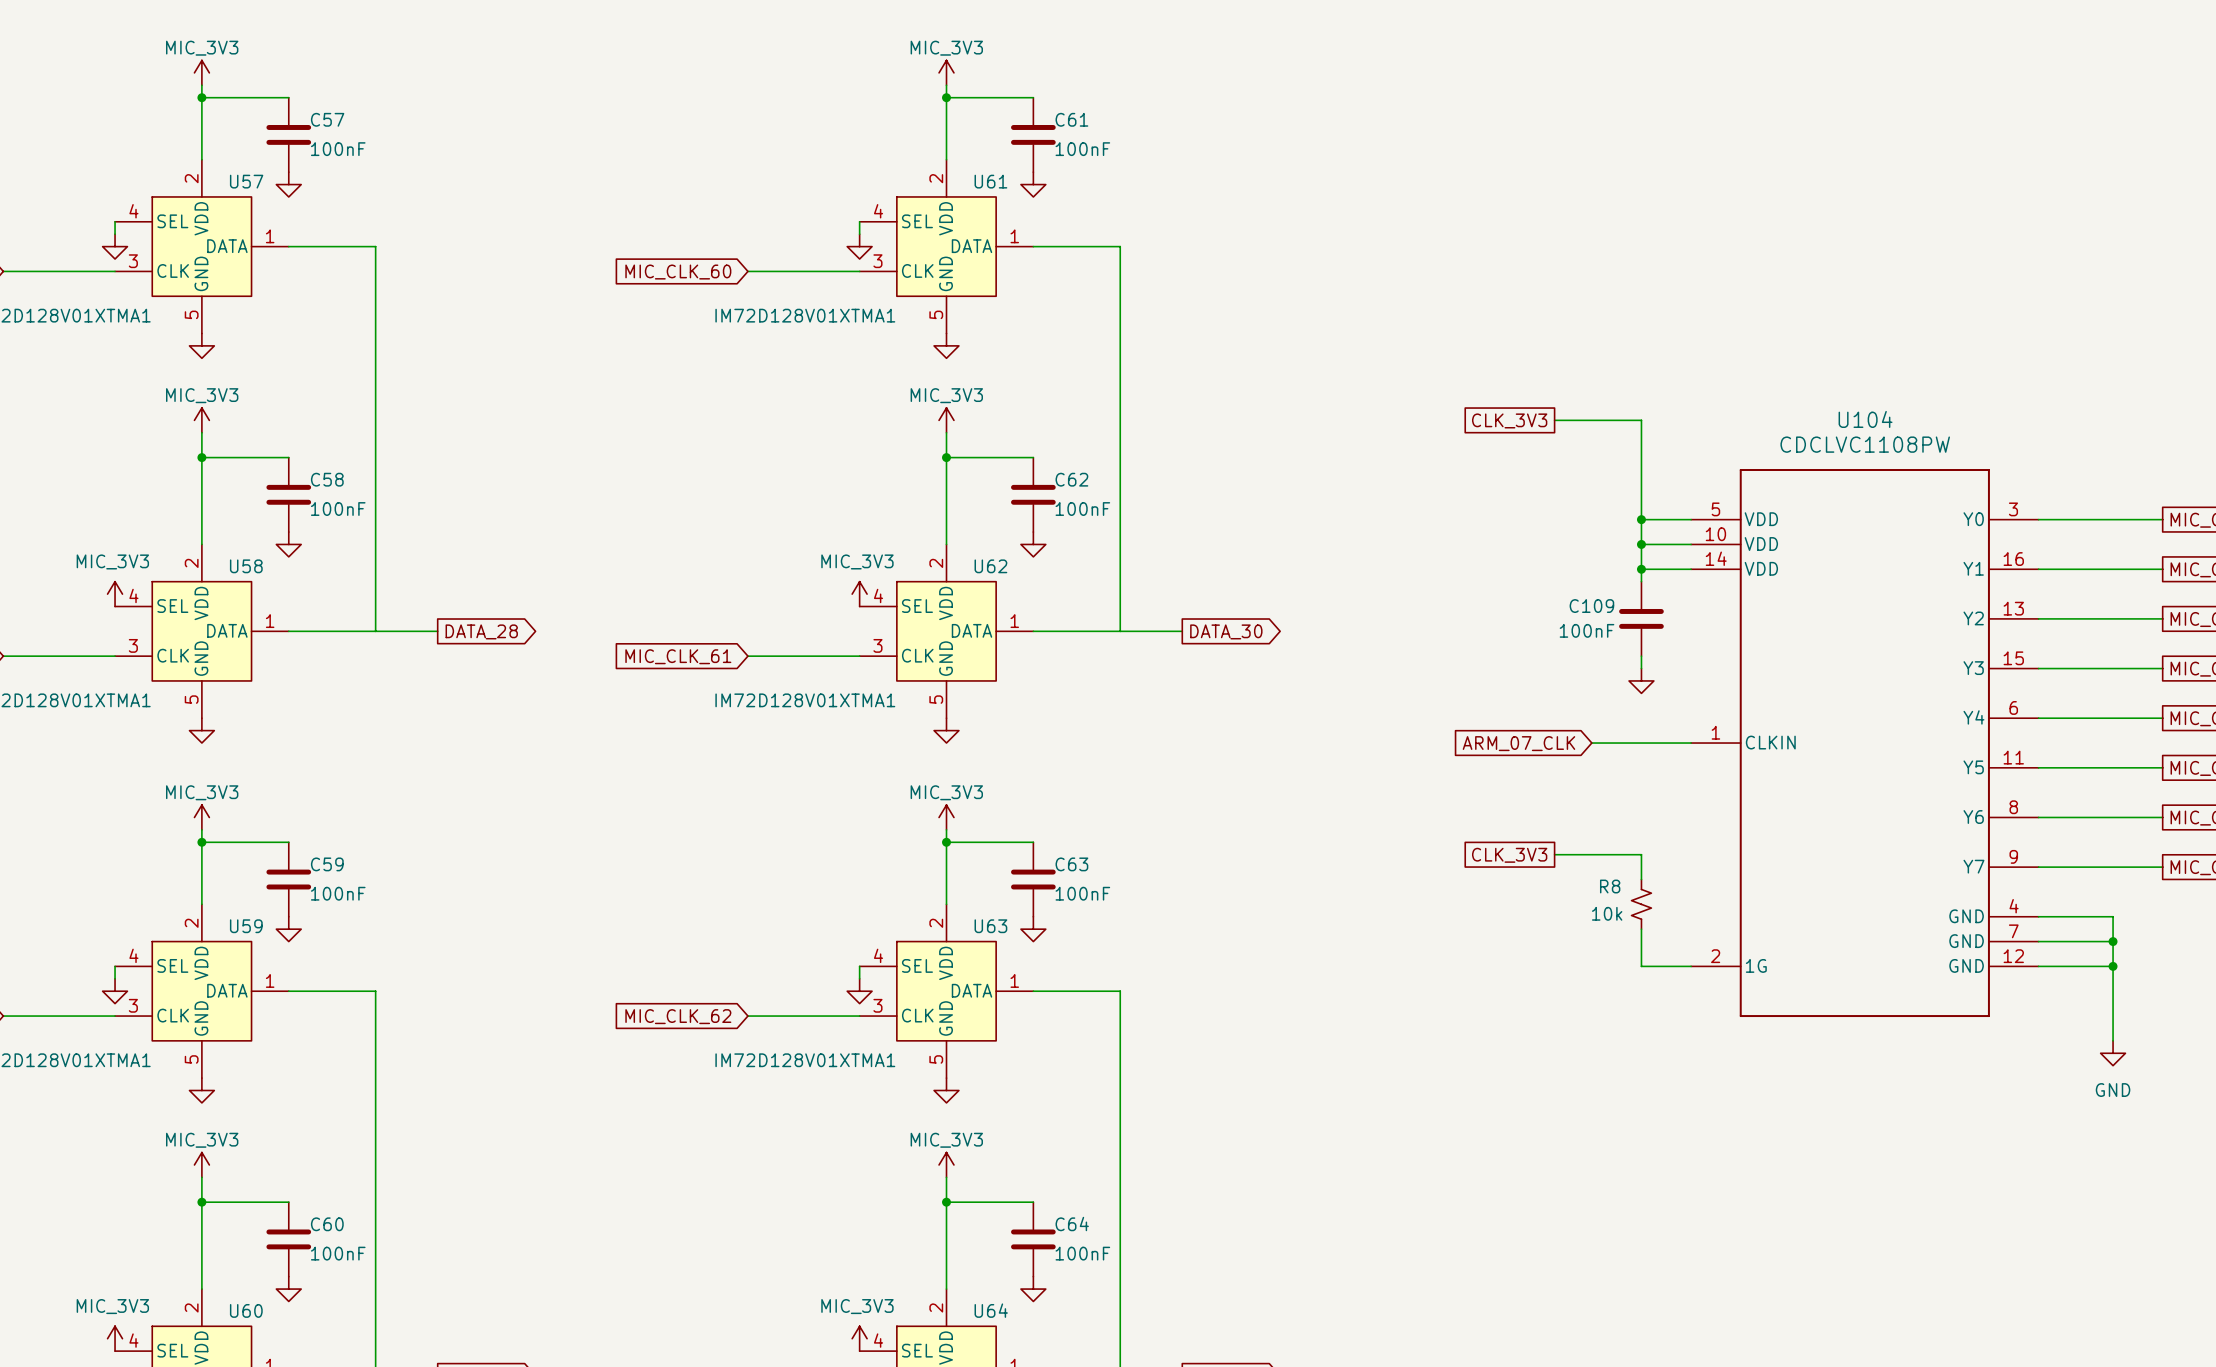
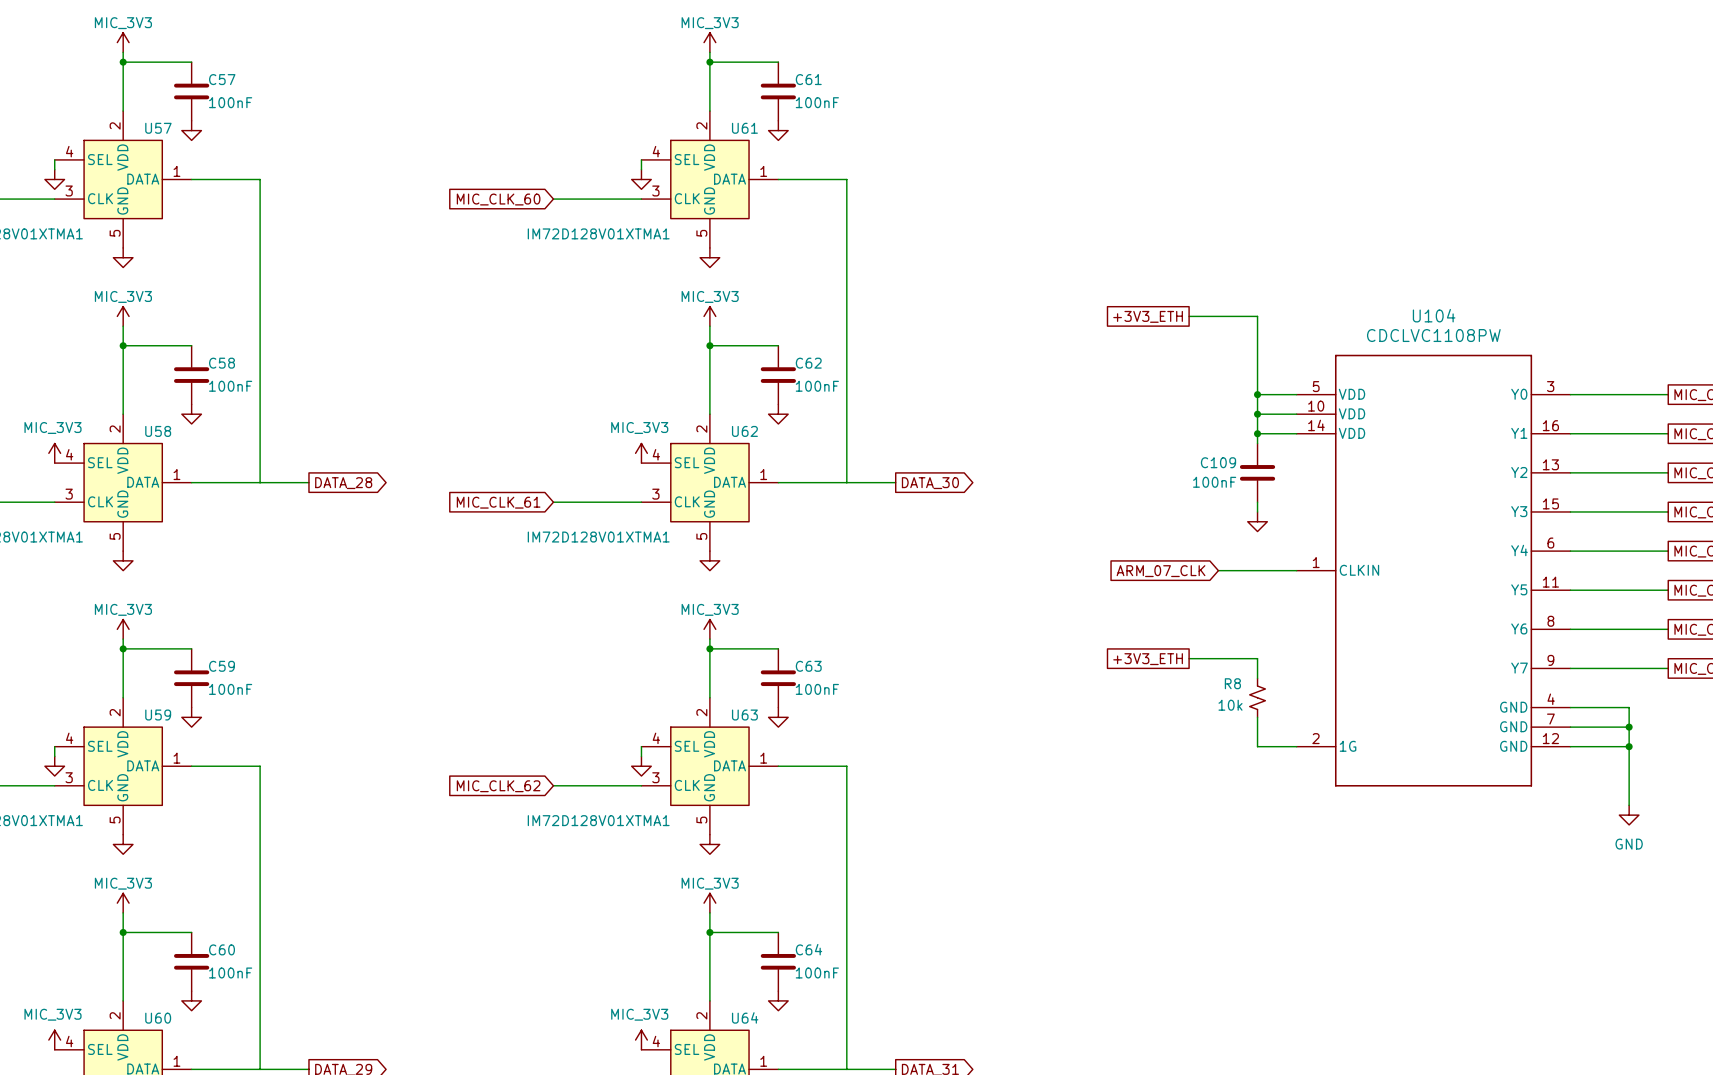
global label: CLK_3V3 (1509, 420) -> +3V3_ETH (1148, 316)
global label: CLK_3V3 (1509, 855) -> +3V3_ETH (1148, 659)

